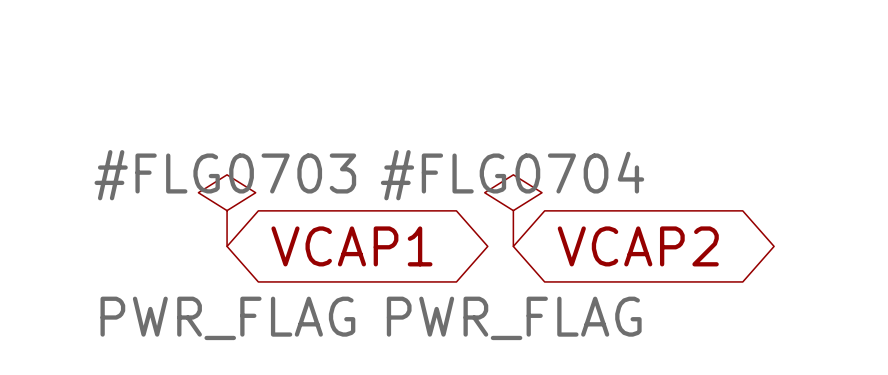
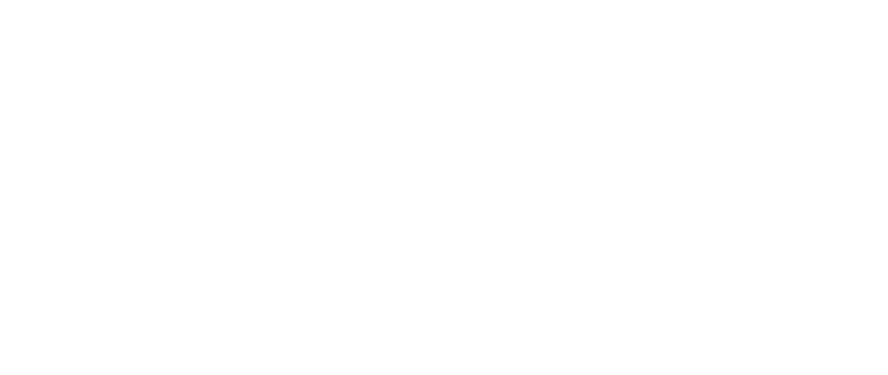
#FLG0703: PWR_FLAG (227, 210) -> none
#FLG0704: PWR_FLAG (513, 210) -> none
global label: VCAP1 (351, 246) -> none
global label: VCAP2 (638, 246) -> none

